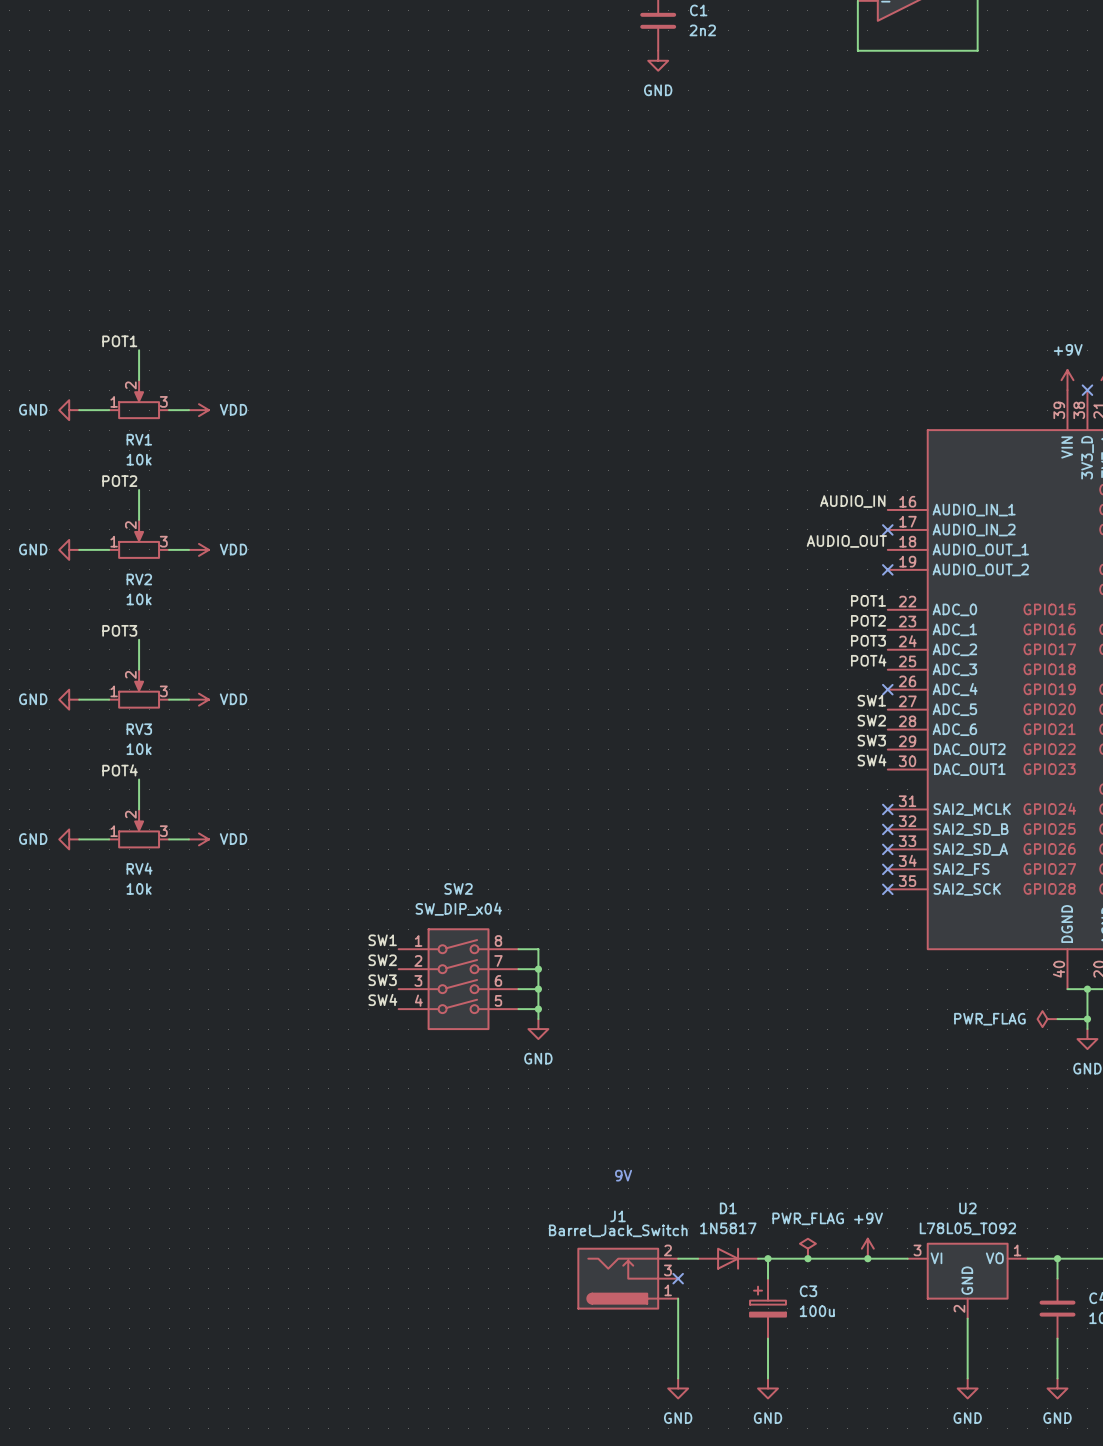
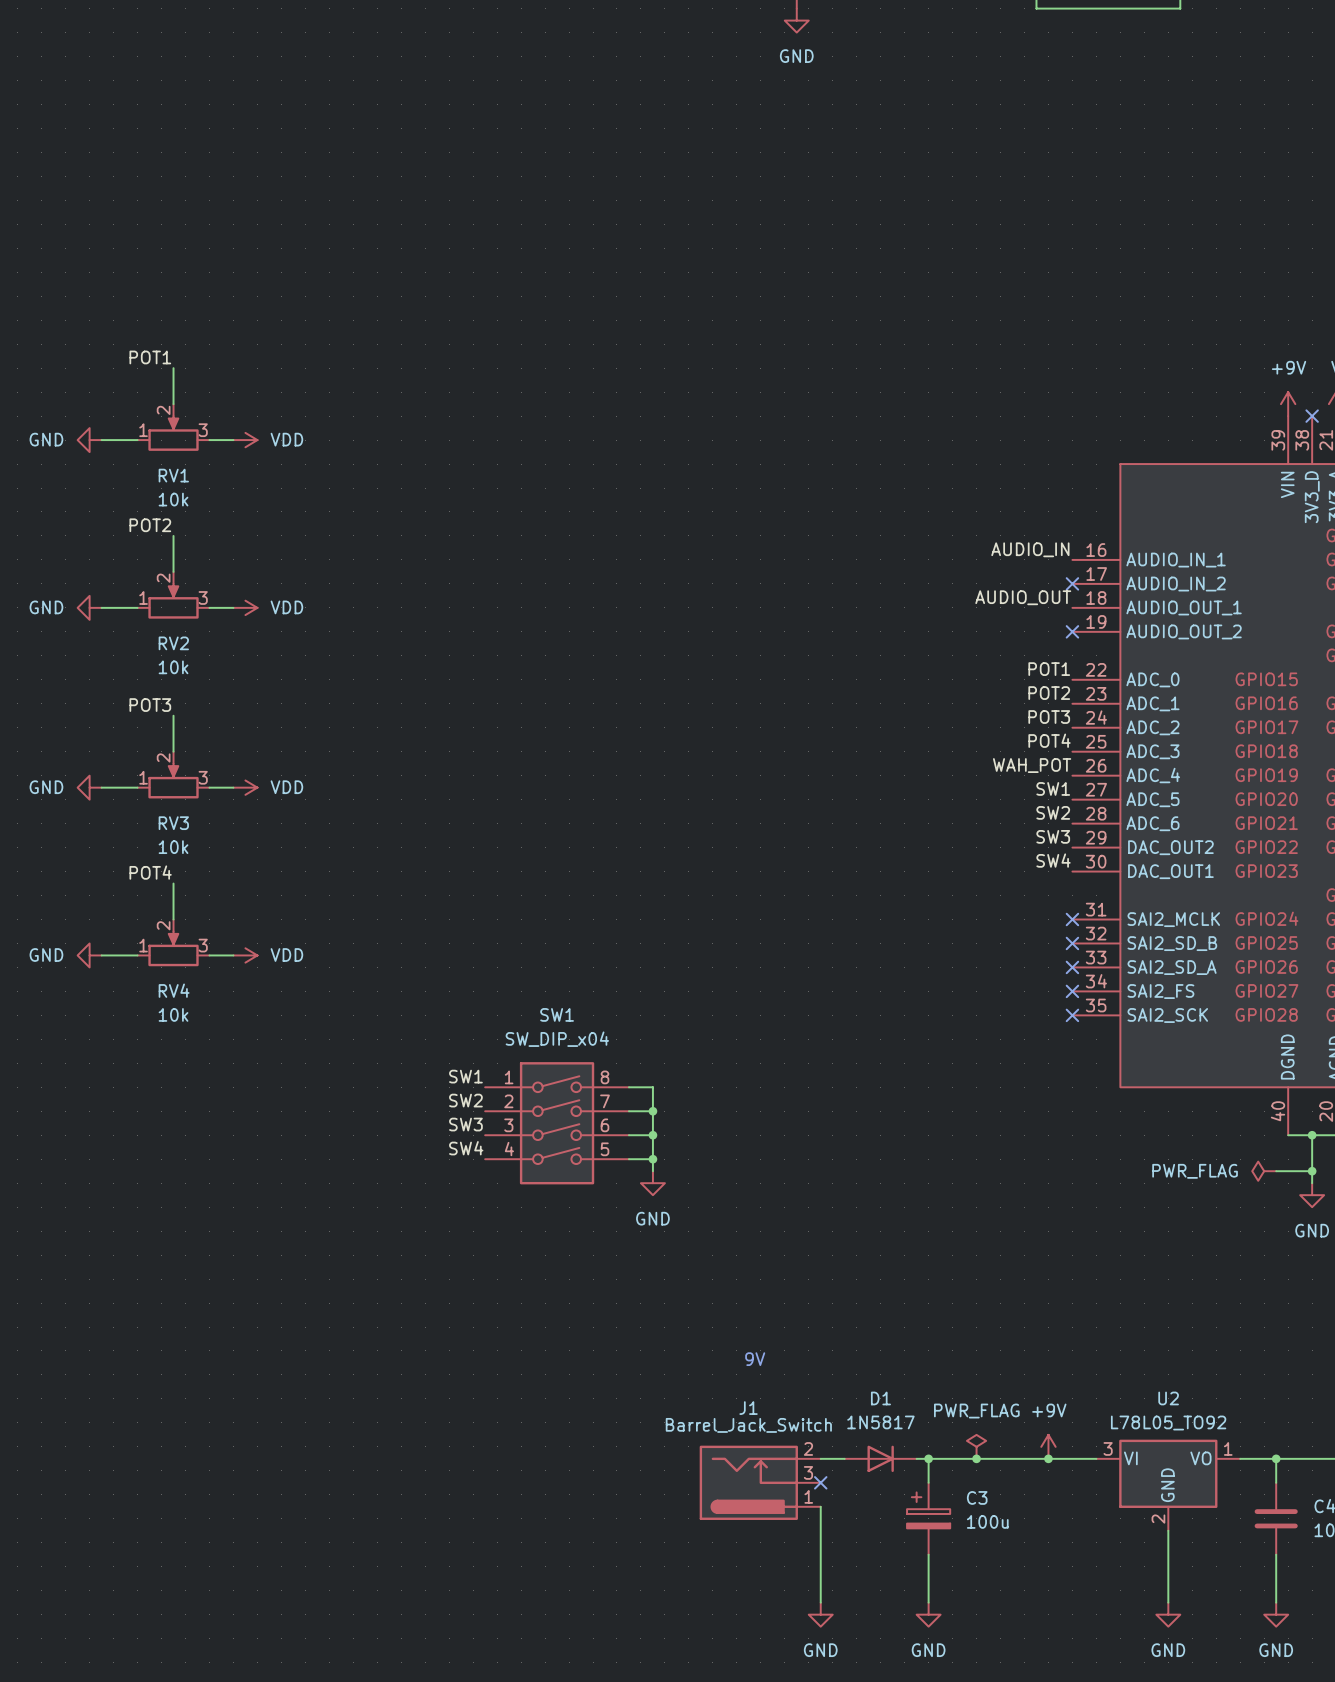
label: none -> WAH_POT (1032, 765)
no-connect mark: (887, 689) -> none
SW2 name: SW2 (458, 888) -> SW1 (557, 1014)

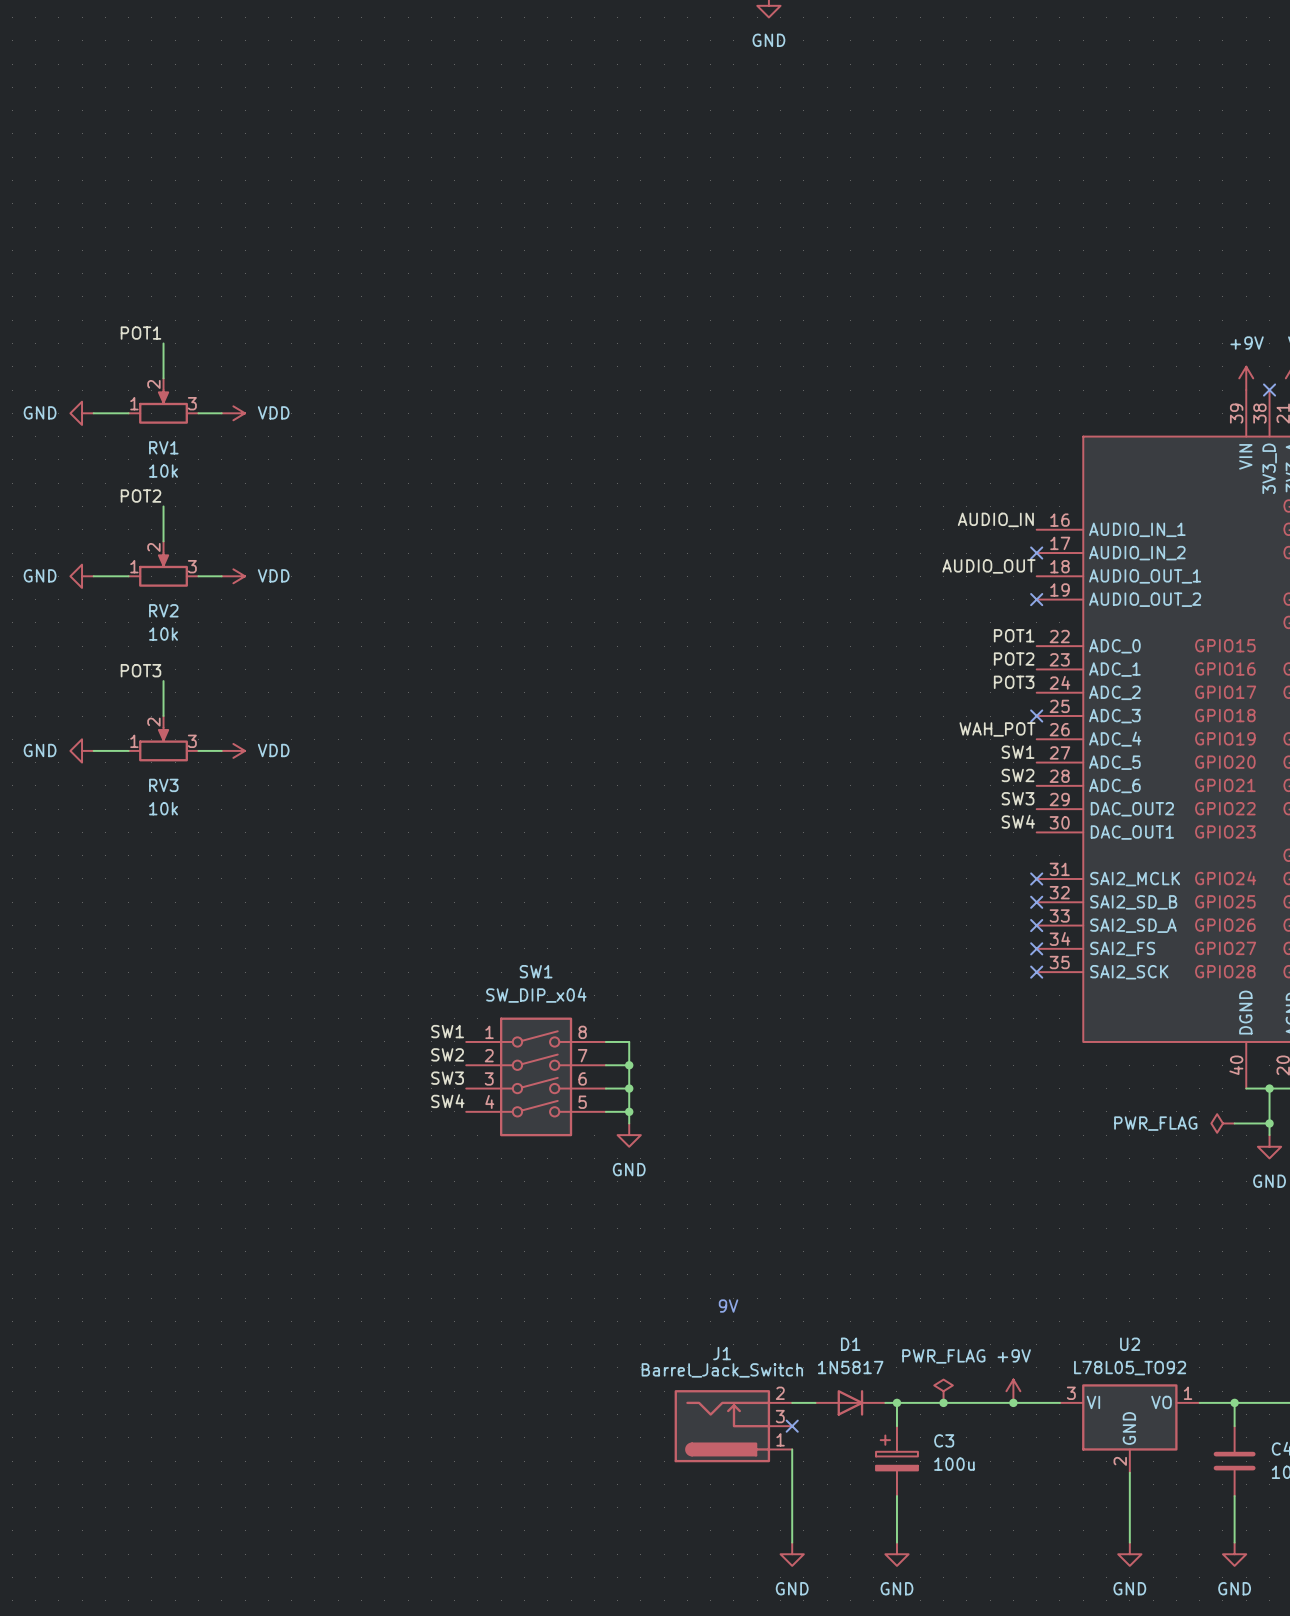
label: POT4 (1049, 740) -> none
no-connect mark: none -> (1036, 716)
label: POT4 (150, 872) -> none
wire: (173, 883) (173, 919) -> none
RV4: 10k (173, 942) -> none
power symbol: GND (89, 955) -> none
wire: (101, 955) (137, 955) -> none
wire: (209, 955) (233, 955) -> none
power symbol: VDD (245, 955) -> none

